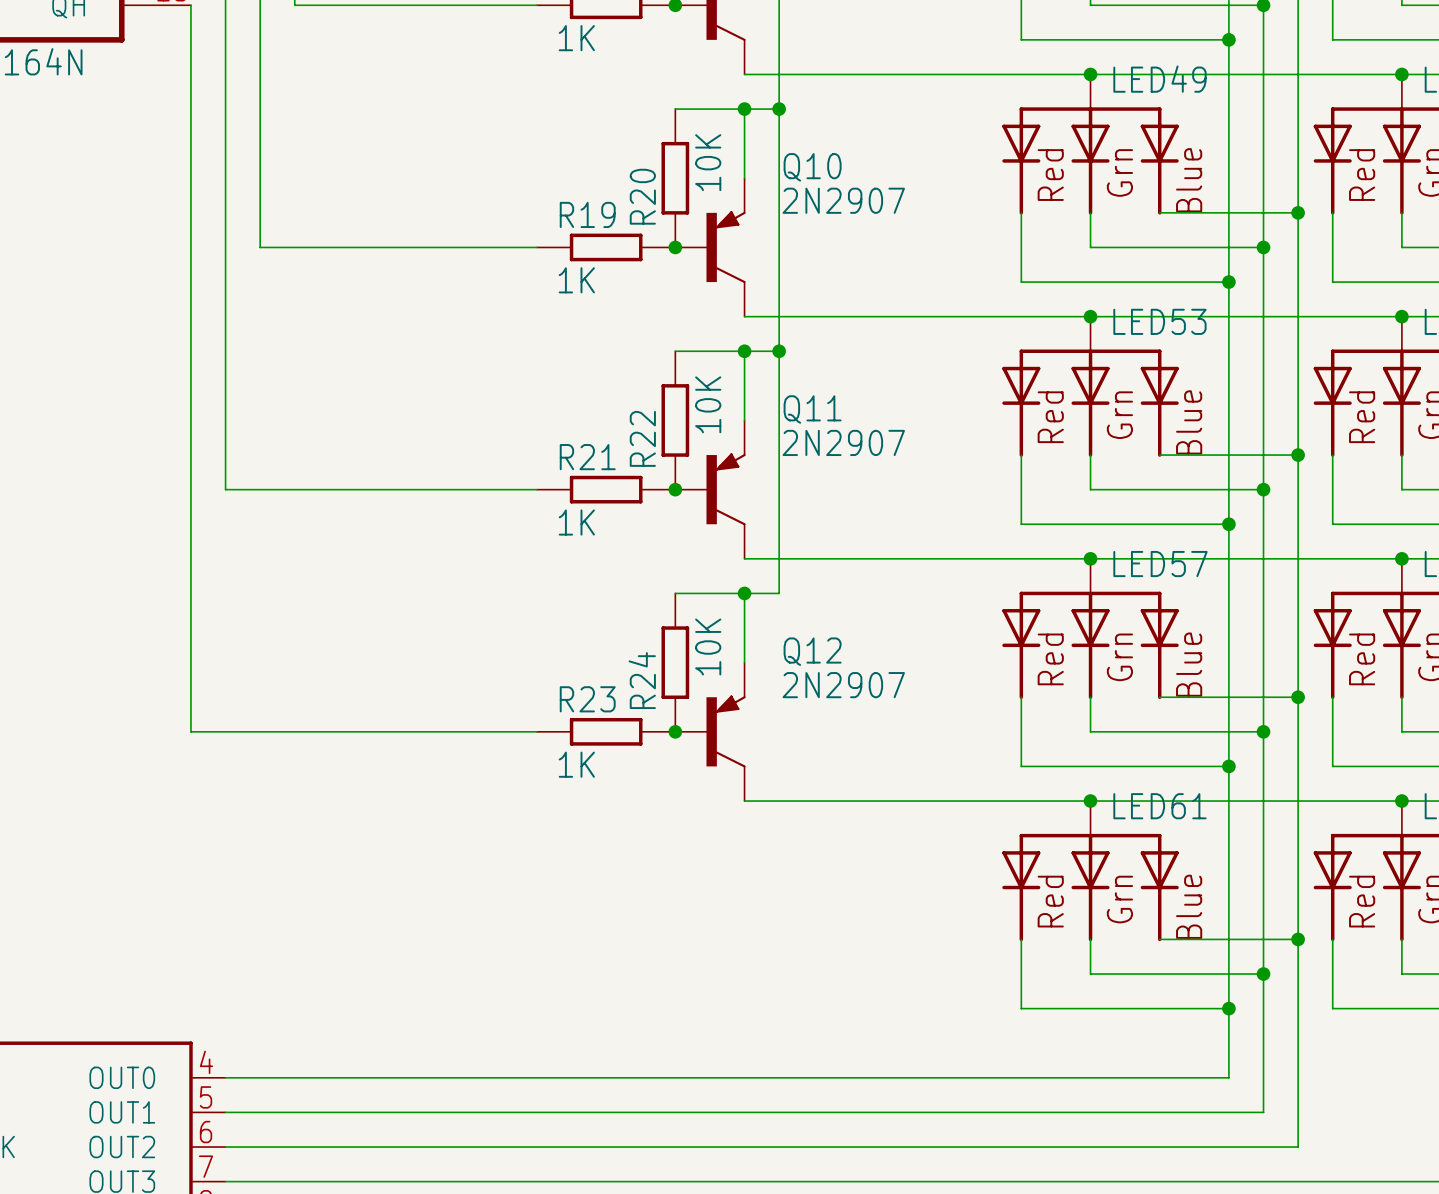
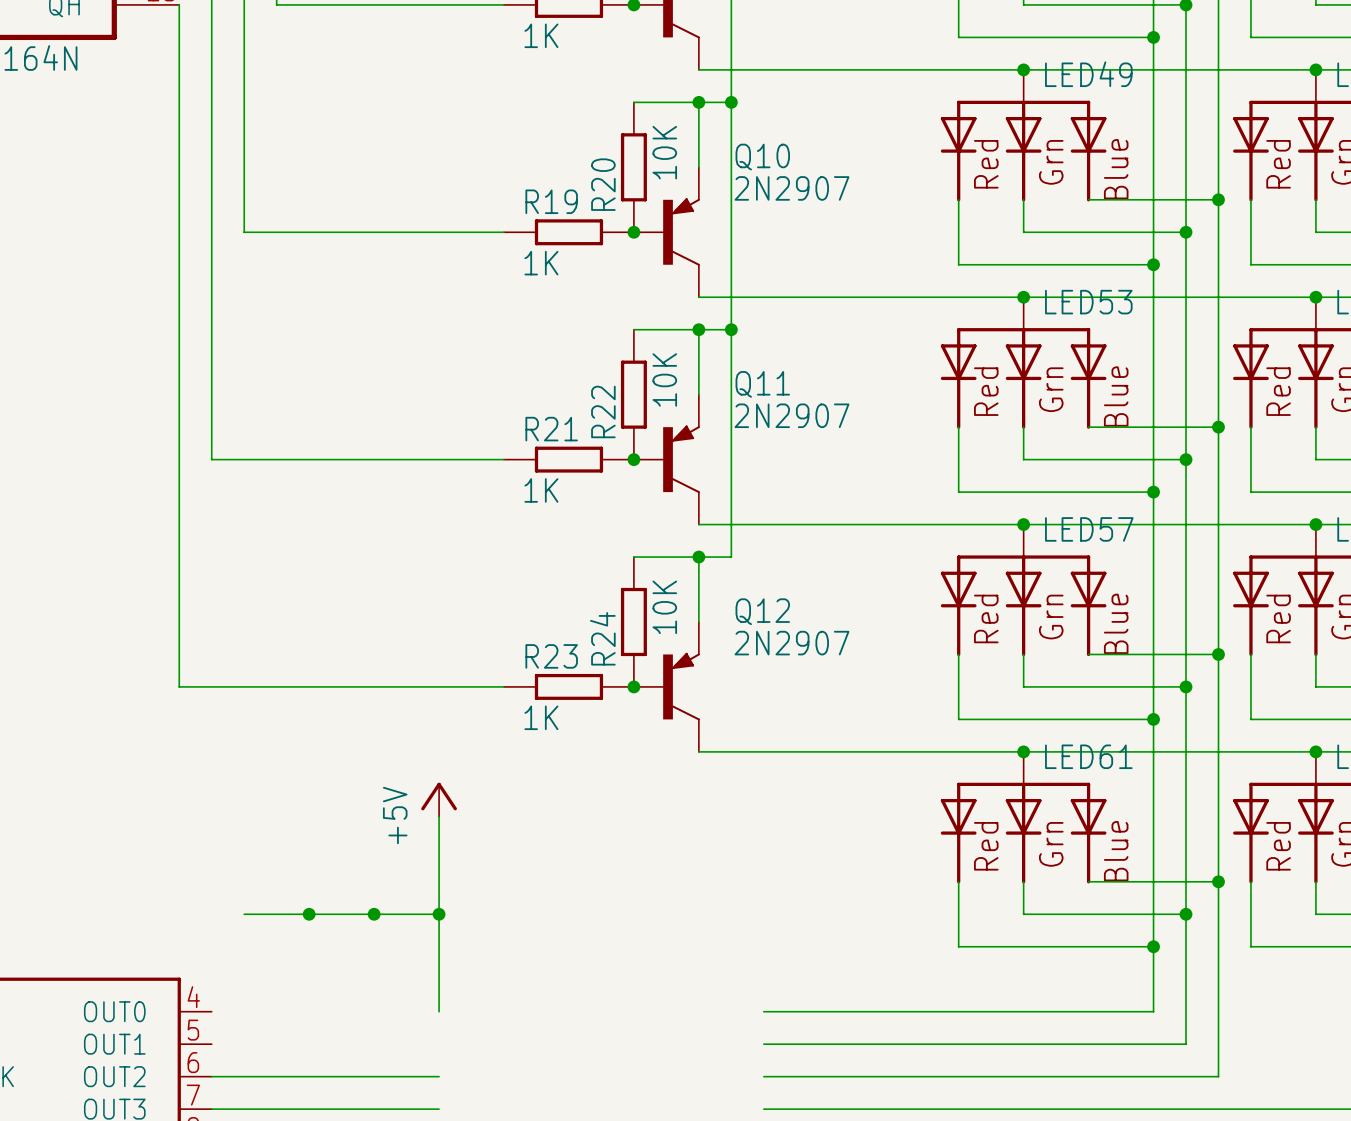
power symbol: none -> +5V (439, 799)
wire: none -> (439, 816) (439, 1011)
wire: none -> (244, 914) (439, 914)
junction: none -> (309, 914)
junction: none -> (374, 914)
junction: none -> (439, 914)
wire: (225, 1077) (813, 1077) -> none
wire: (225, 1112) (813, 1112) -> none
wire: (467, 1147) (813, 1147) -> none
wire: (467, 1181) (813, 1181) -> none

